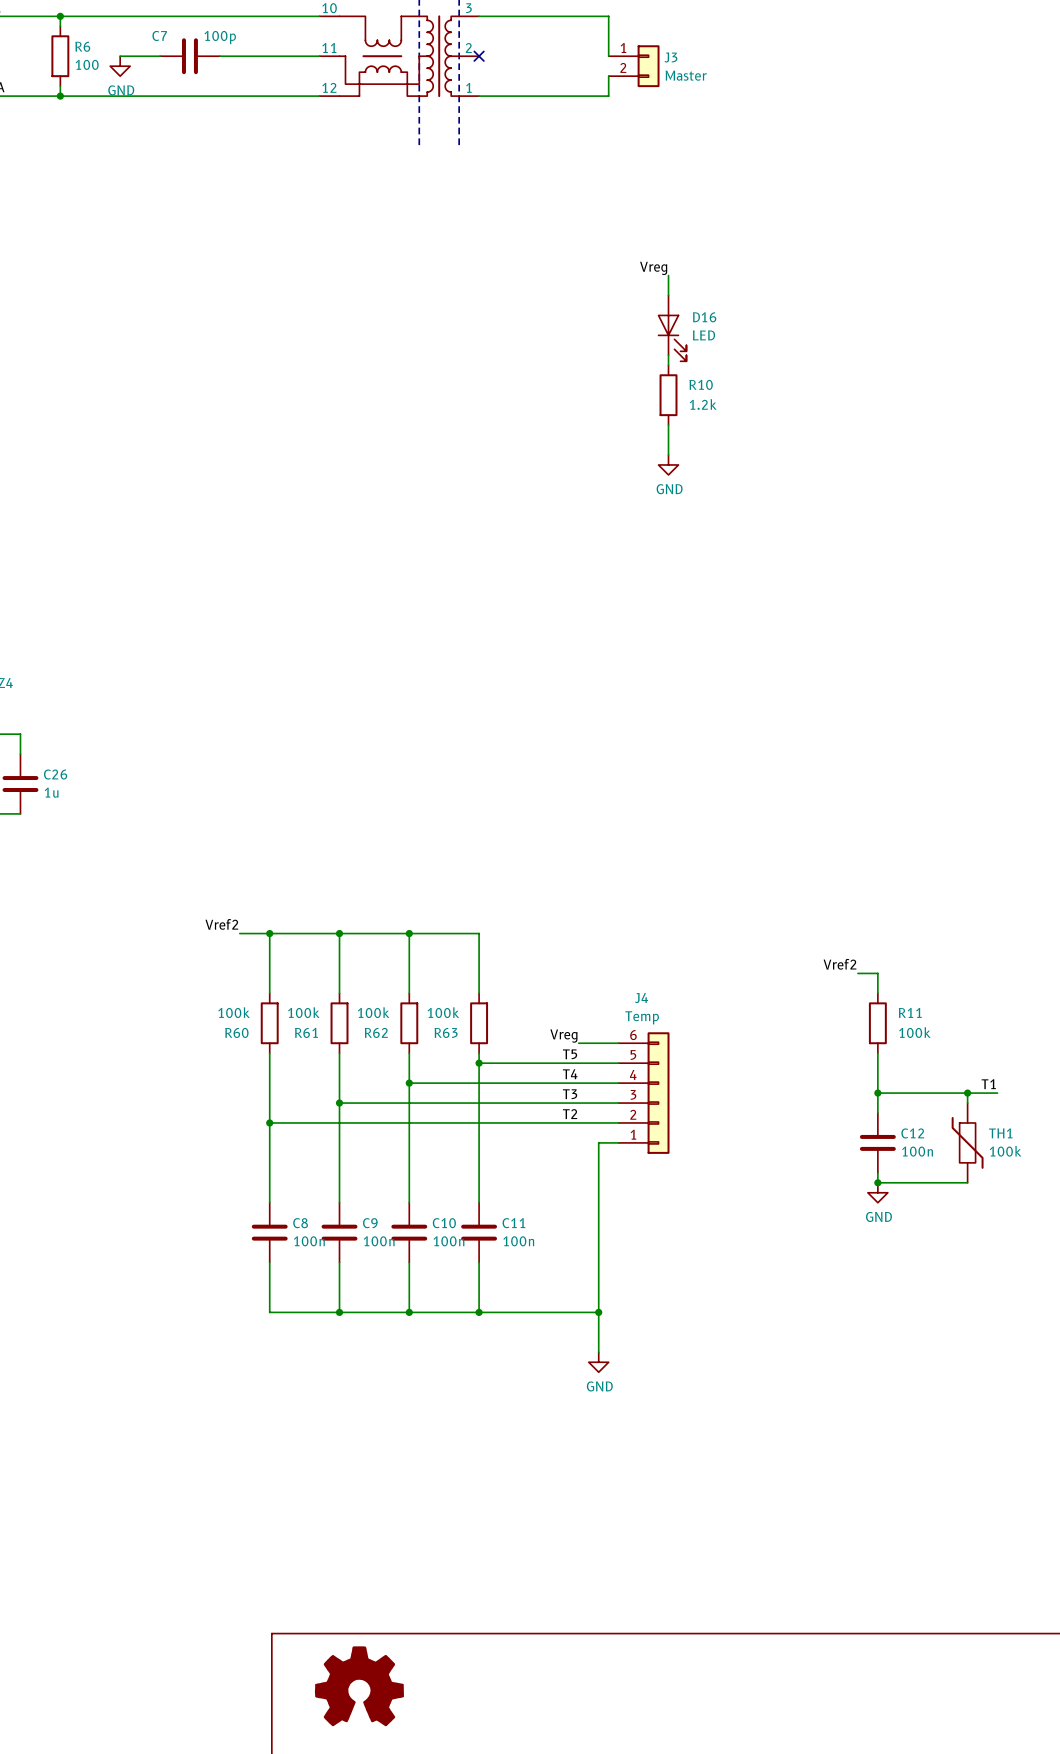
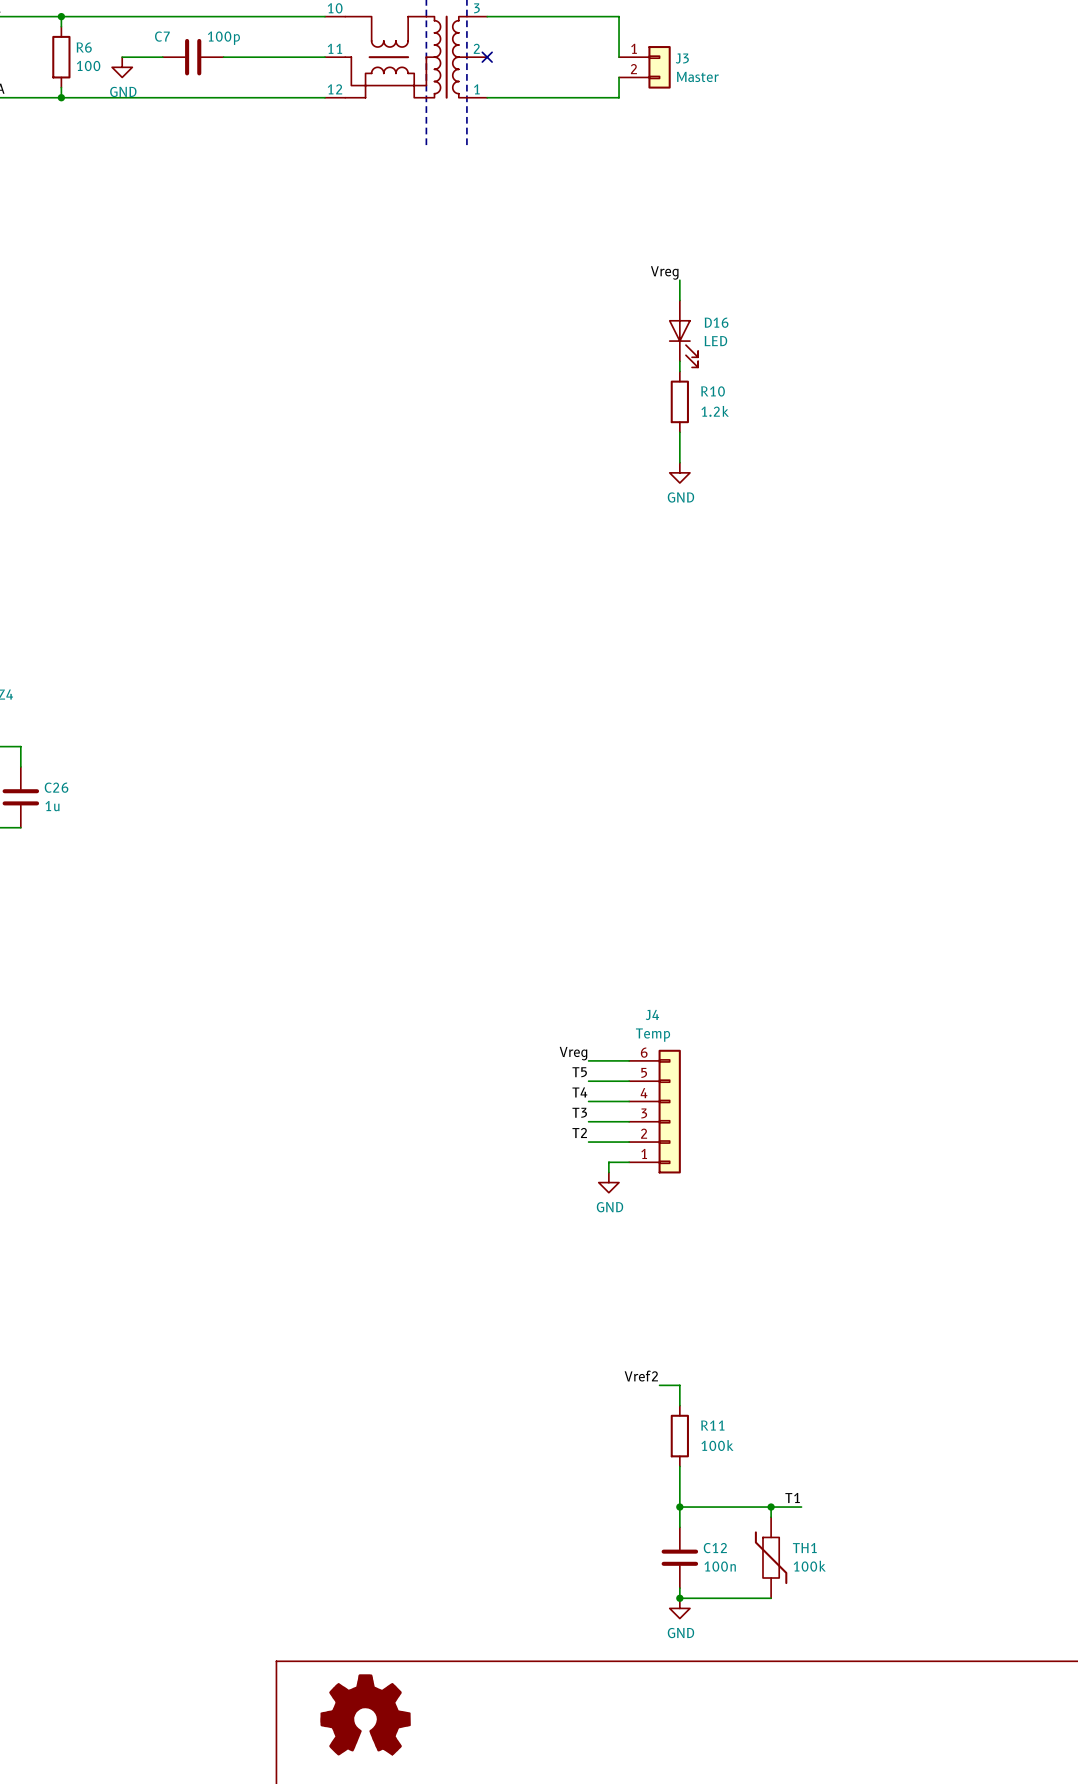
label: Vref2 (221, 924) -> none
wire: (239, 933) (479, 933) (479, 993) -> none
wire: (269, 933) (269, 993) -> none
junction: (269, 933) -> none
wire: (339, 933) (339, 993) -> none
junction: (339, 933) -> none
wire: (409, 933) (409, 993) -> none
junction: (409, 933) -> none
label: Vref2 (839, 964) -> none
wire: (857, 973) (877, 973) (877, 993) -> none
R60: 100k (269, 1023) -> none
R61: 100k (339, 1023) -> none
R62: 100k (409, 1023) -> none
R63: 100k (479, 1023) -> none
R11 position: (877, 1023) -> (679, 1436)
wire: (269, 1053) (269, 1202) -> none
wire: (339, 1053) (339, 1202) -> none
wire: (409, 1053) (409, 1202) -> none
wire: (479, 1053) (479, 1202) -> none
wire: (877, 1053) (877, 1113) -> none
wire: (479, 1063) (578, 1063) -> none
junction: (479, 1063) -> none
wire: (409, 1083) (578, 1083) -> none
junction: (409, 1083) -> none
label: T1 (988, 1084) -> none
wire: (877, 1093) (997, 1093) -> none
junction: (877, 1093) -> none
wire: (967, 1093) (967, 1103) -> none
junction: (967, 1093) -> none
wire: (339, 1103) (578, 1103) -> none
junction: (339, 1103) -> none
wire: (269, 1122) (578, 1122) -> none
junction: (269, 1122) -> none
C12 position: (877, 1142) -> (679, 1557)
TH1 position: (967, 1142) -> (771, 1557)
wire: (598, 1152) (598, 1352) -> none
power symbol: none -> GND (608, 1182)
wire: (877, 1172) (877, 1182) (967, 1182) -> none
junction: (877, 1182) -> none
power symbol: GND (877, 1192) -> none
C8: 100n (269, 1232) -> none
C9: 100n (339, 1232) -> none
C10: 100n (409, 1232) -> none
C11: 100n (479, 1232) -> none
wire: (269, 1262) (269, 1312) (598, 1312) -> none
wire: (339, 1262) (339, 1312) -> none
wire: (409, 1262) (409, 1312) -> none
wire: (479, 1262) (479, 1312) -> none
junction: (339, 1312) -> none
junction: (409, 1312) -> none
junction: (479, 1312) -> none
junction: (598, 1312) -> none
label: none -> Vref2 (641, 1376)
power symbol: GND (598, 1362) -> none
wire: none -> (659, 1385) (679, 1385) (679, 1405)
wire: none -> (679, 1466) (679, 1527)
label: none -> T1 (792, 1497)
wire: none -> (679, 1507) (801, 1507)
junction: none -> (679, 1507)
wire: none -> (771, 1507) (771, 1517)
junction: none -> (771, 1507)
wire: none -> (679, 1588) (679, 1598) (771, 1598)
junction: none -> (679, 1598)
power symbol: none -> GND (679, 1608)

